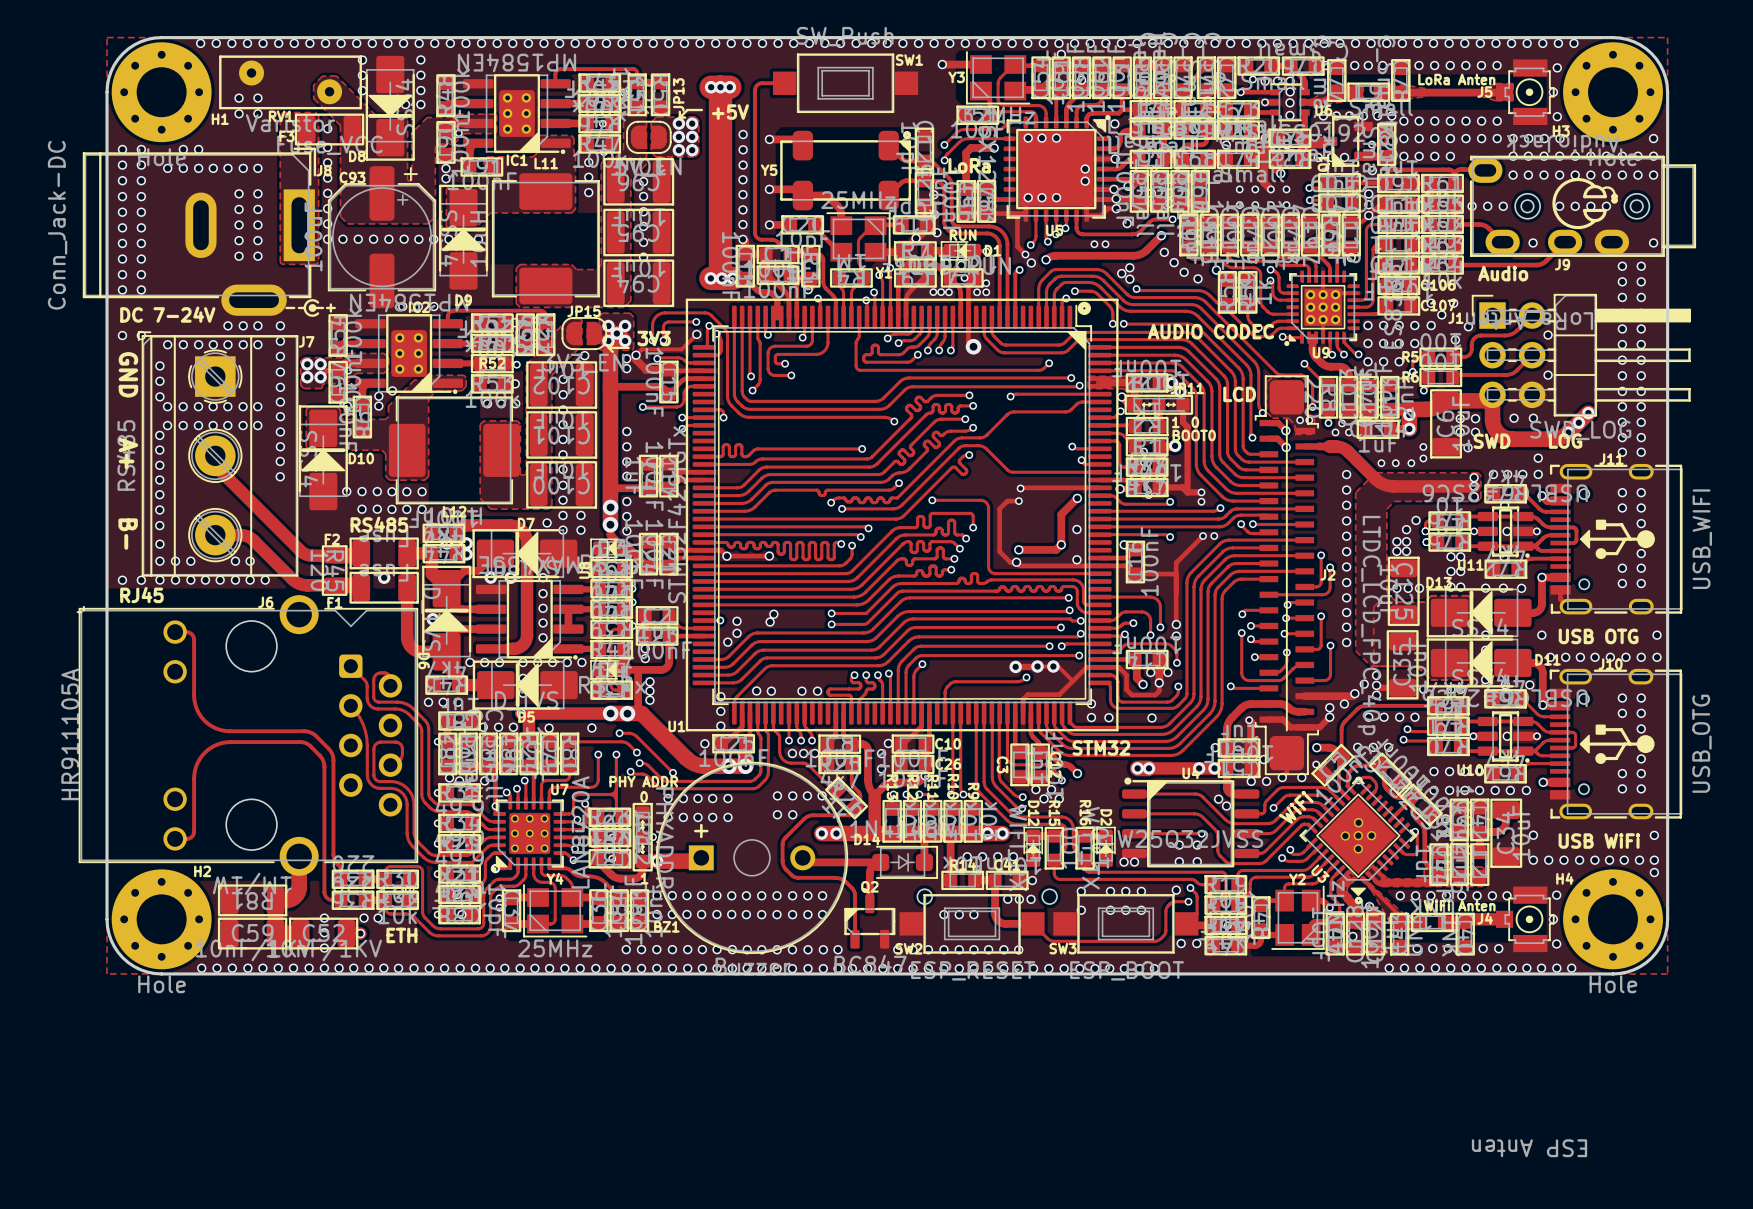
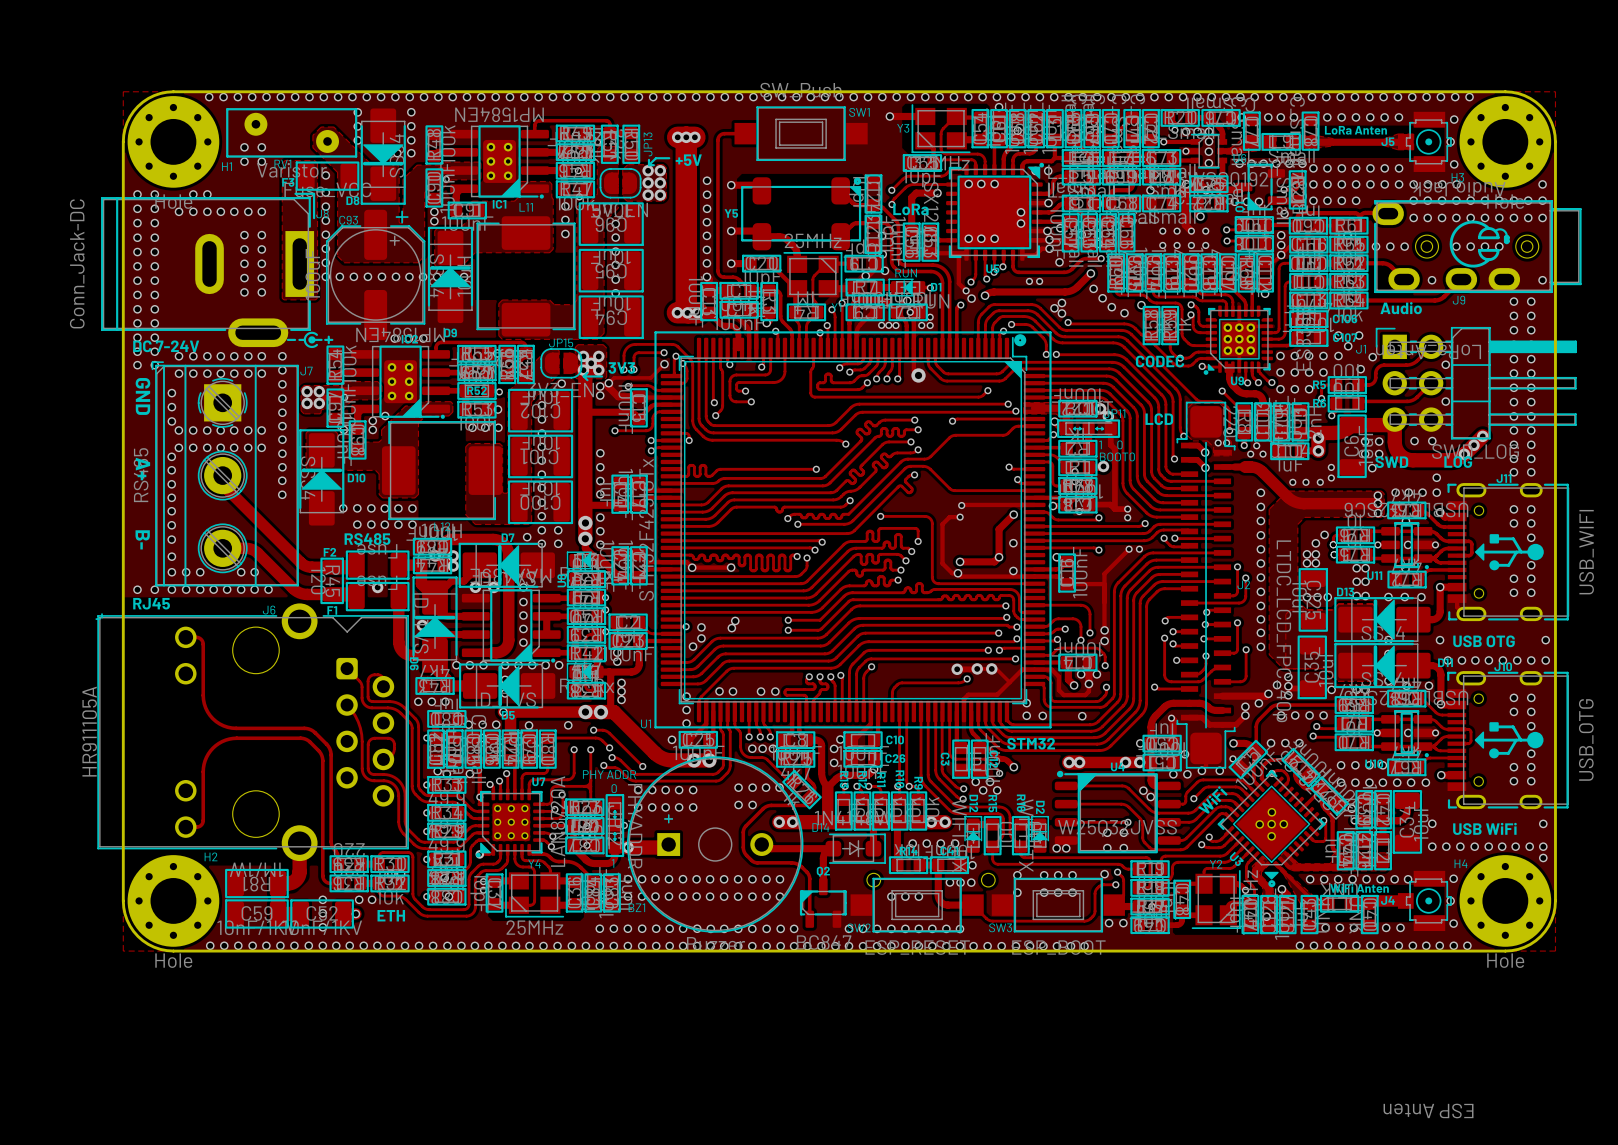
via: none -> (137, 337)
via: none -> (154, 337)
via: none -> (137, 351)
via: none -> (154, 351)
via: none -> (179, 356)
via: none -> (193, 356)
via: none -> (207, 356)
via: none -> (220, 356)
text: AUDIO CODEC (1211, 331) -> CODEC (1160, 361)

